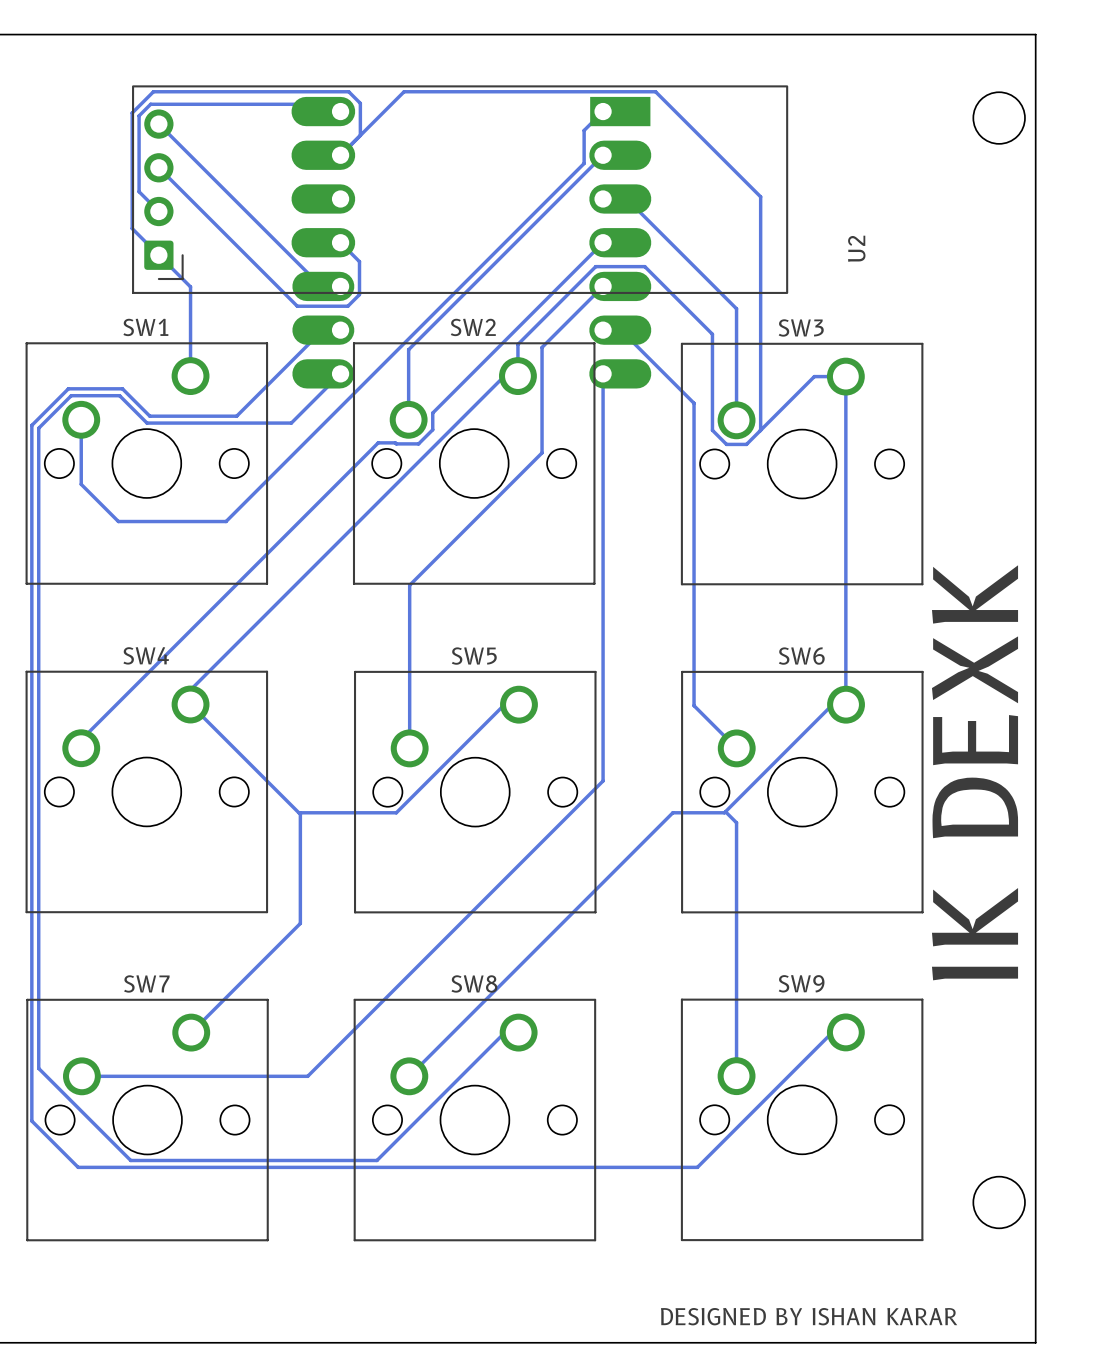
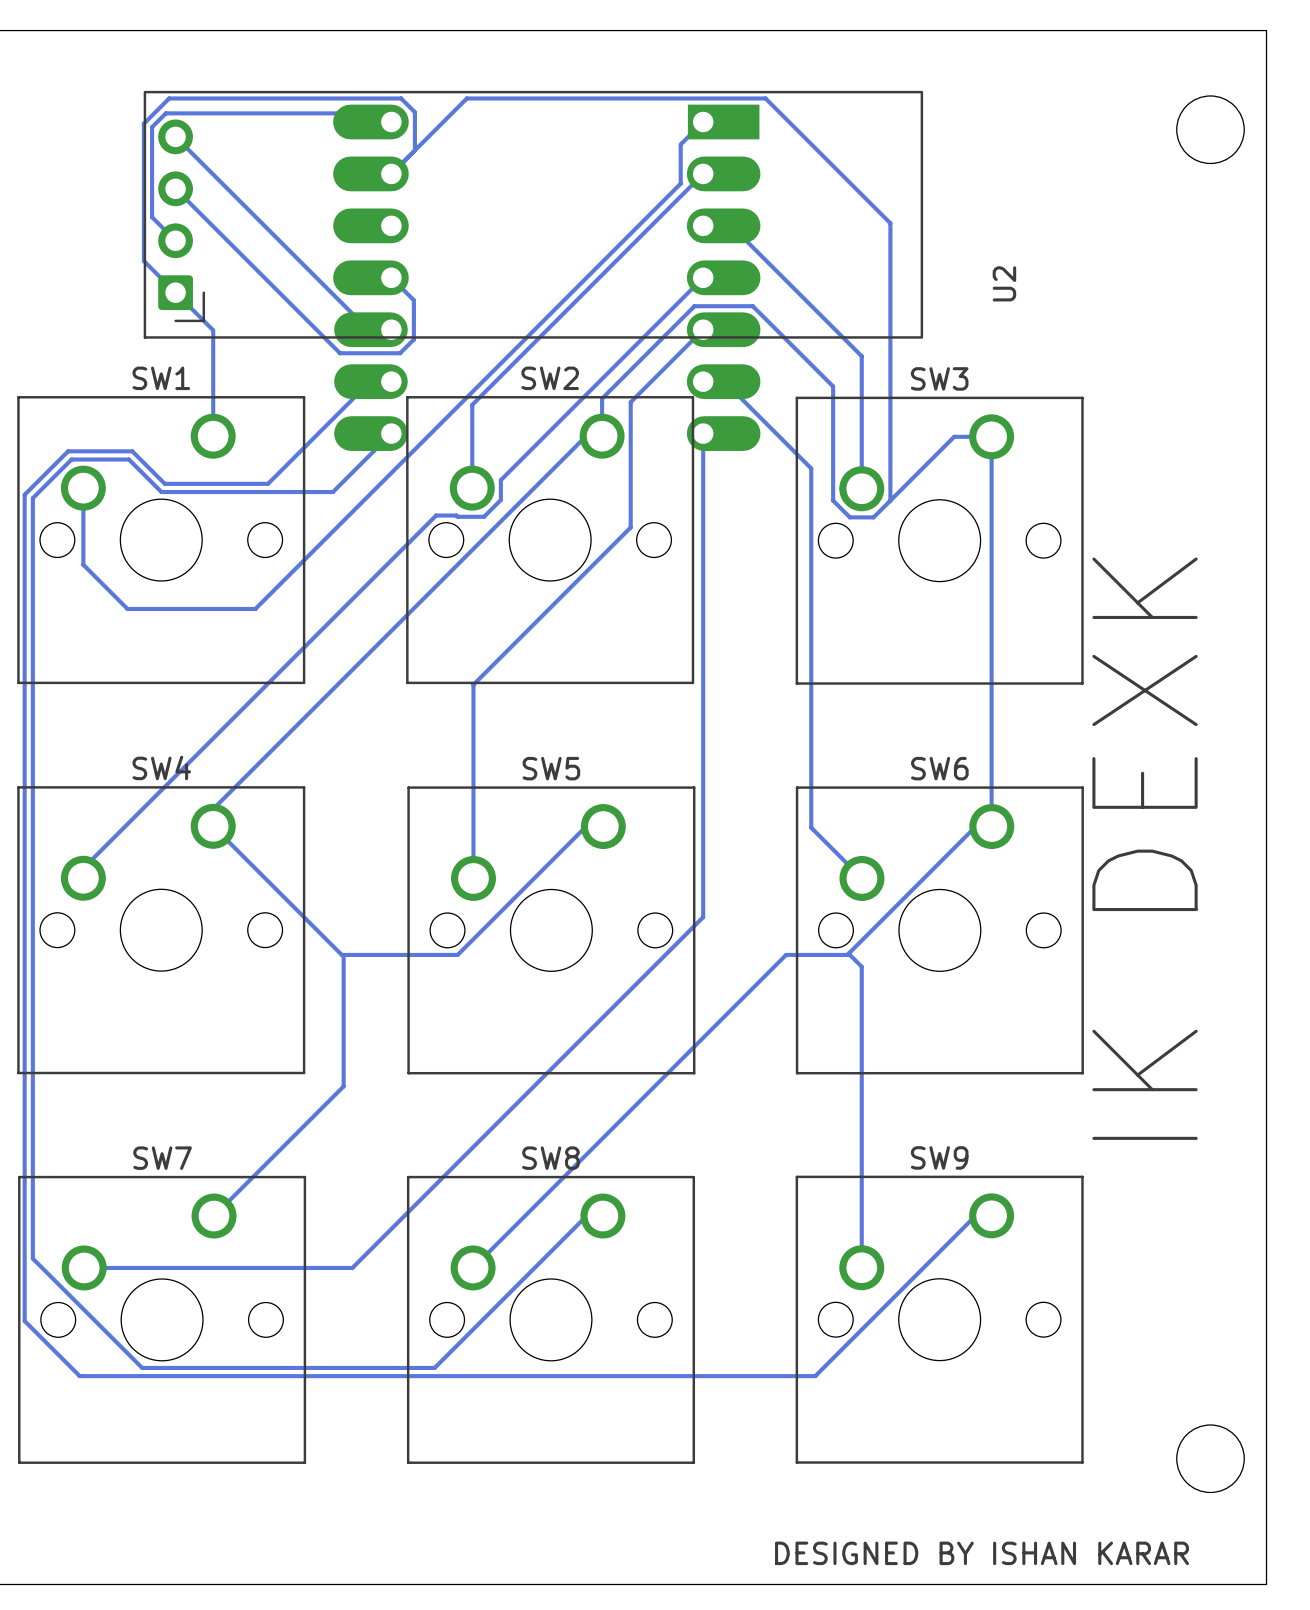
board edge: (1035, 34) (1035, 1342) -> (1217, 30) (1266, 30) (1266, 1584) (1217, 1584)
round board edge: none -> [1176, 95, 1245, 164]
round board edge: [972, 91, 1026, 145] -> none
round board edge: [972, 1176, 1026, 1229] -> none
round board edge: none -> [1176, 1424, 1245, 1493]

